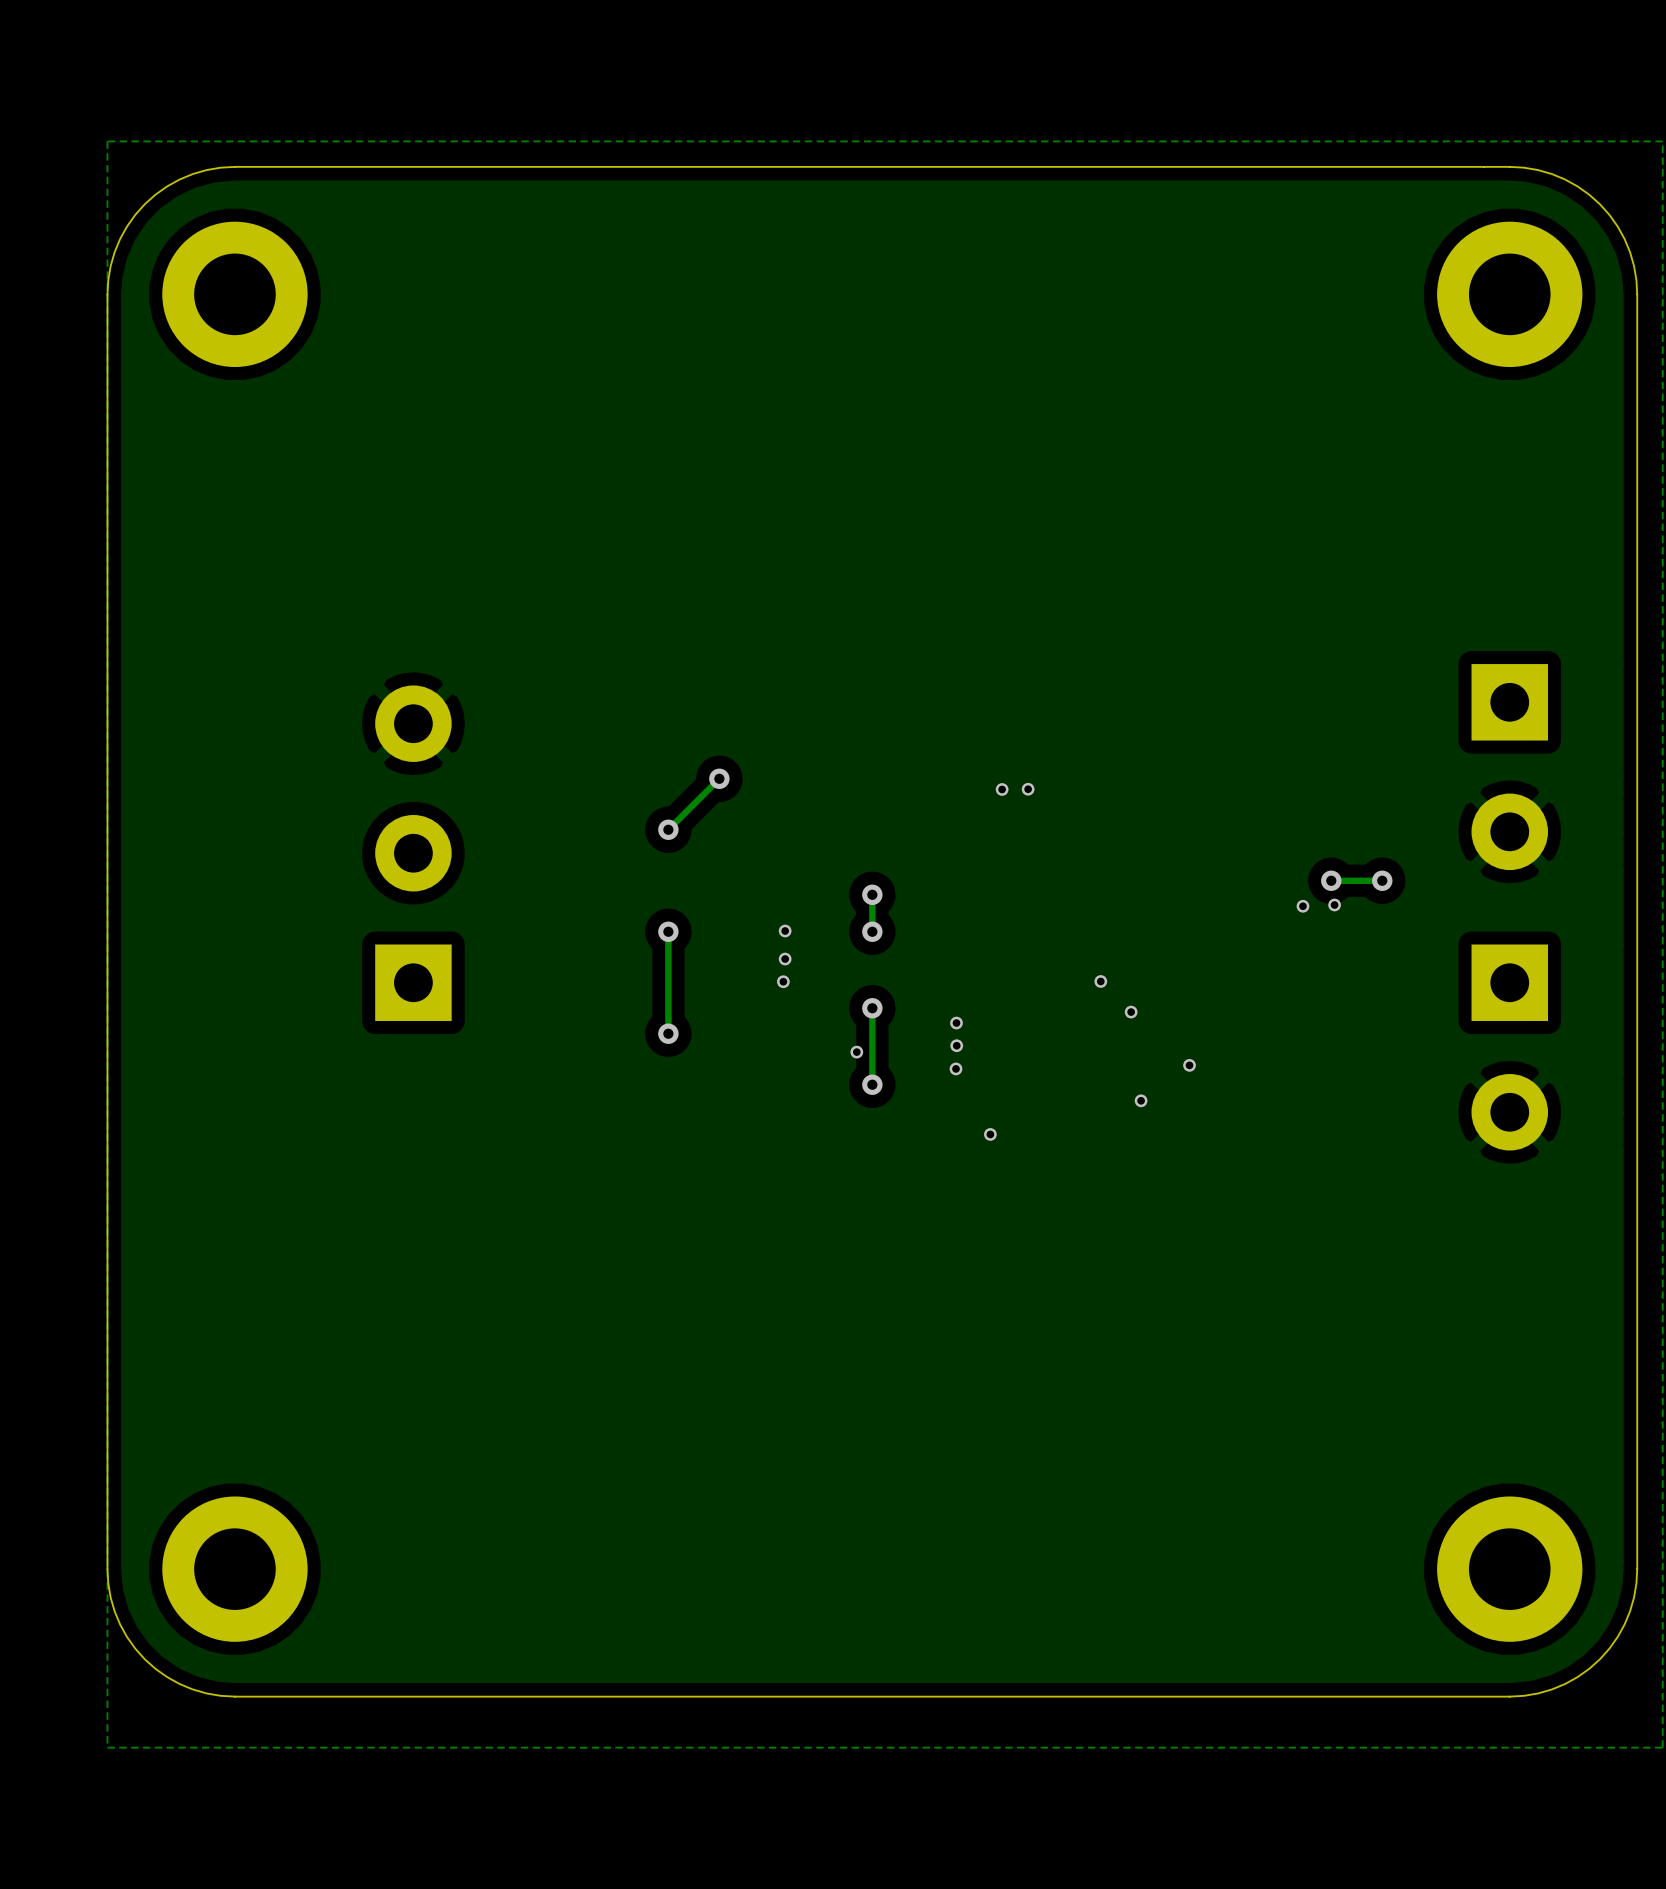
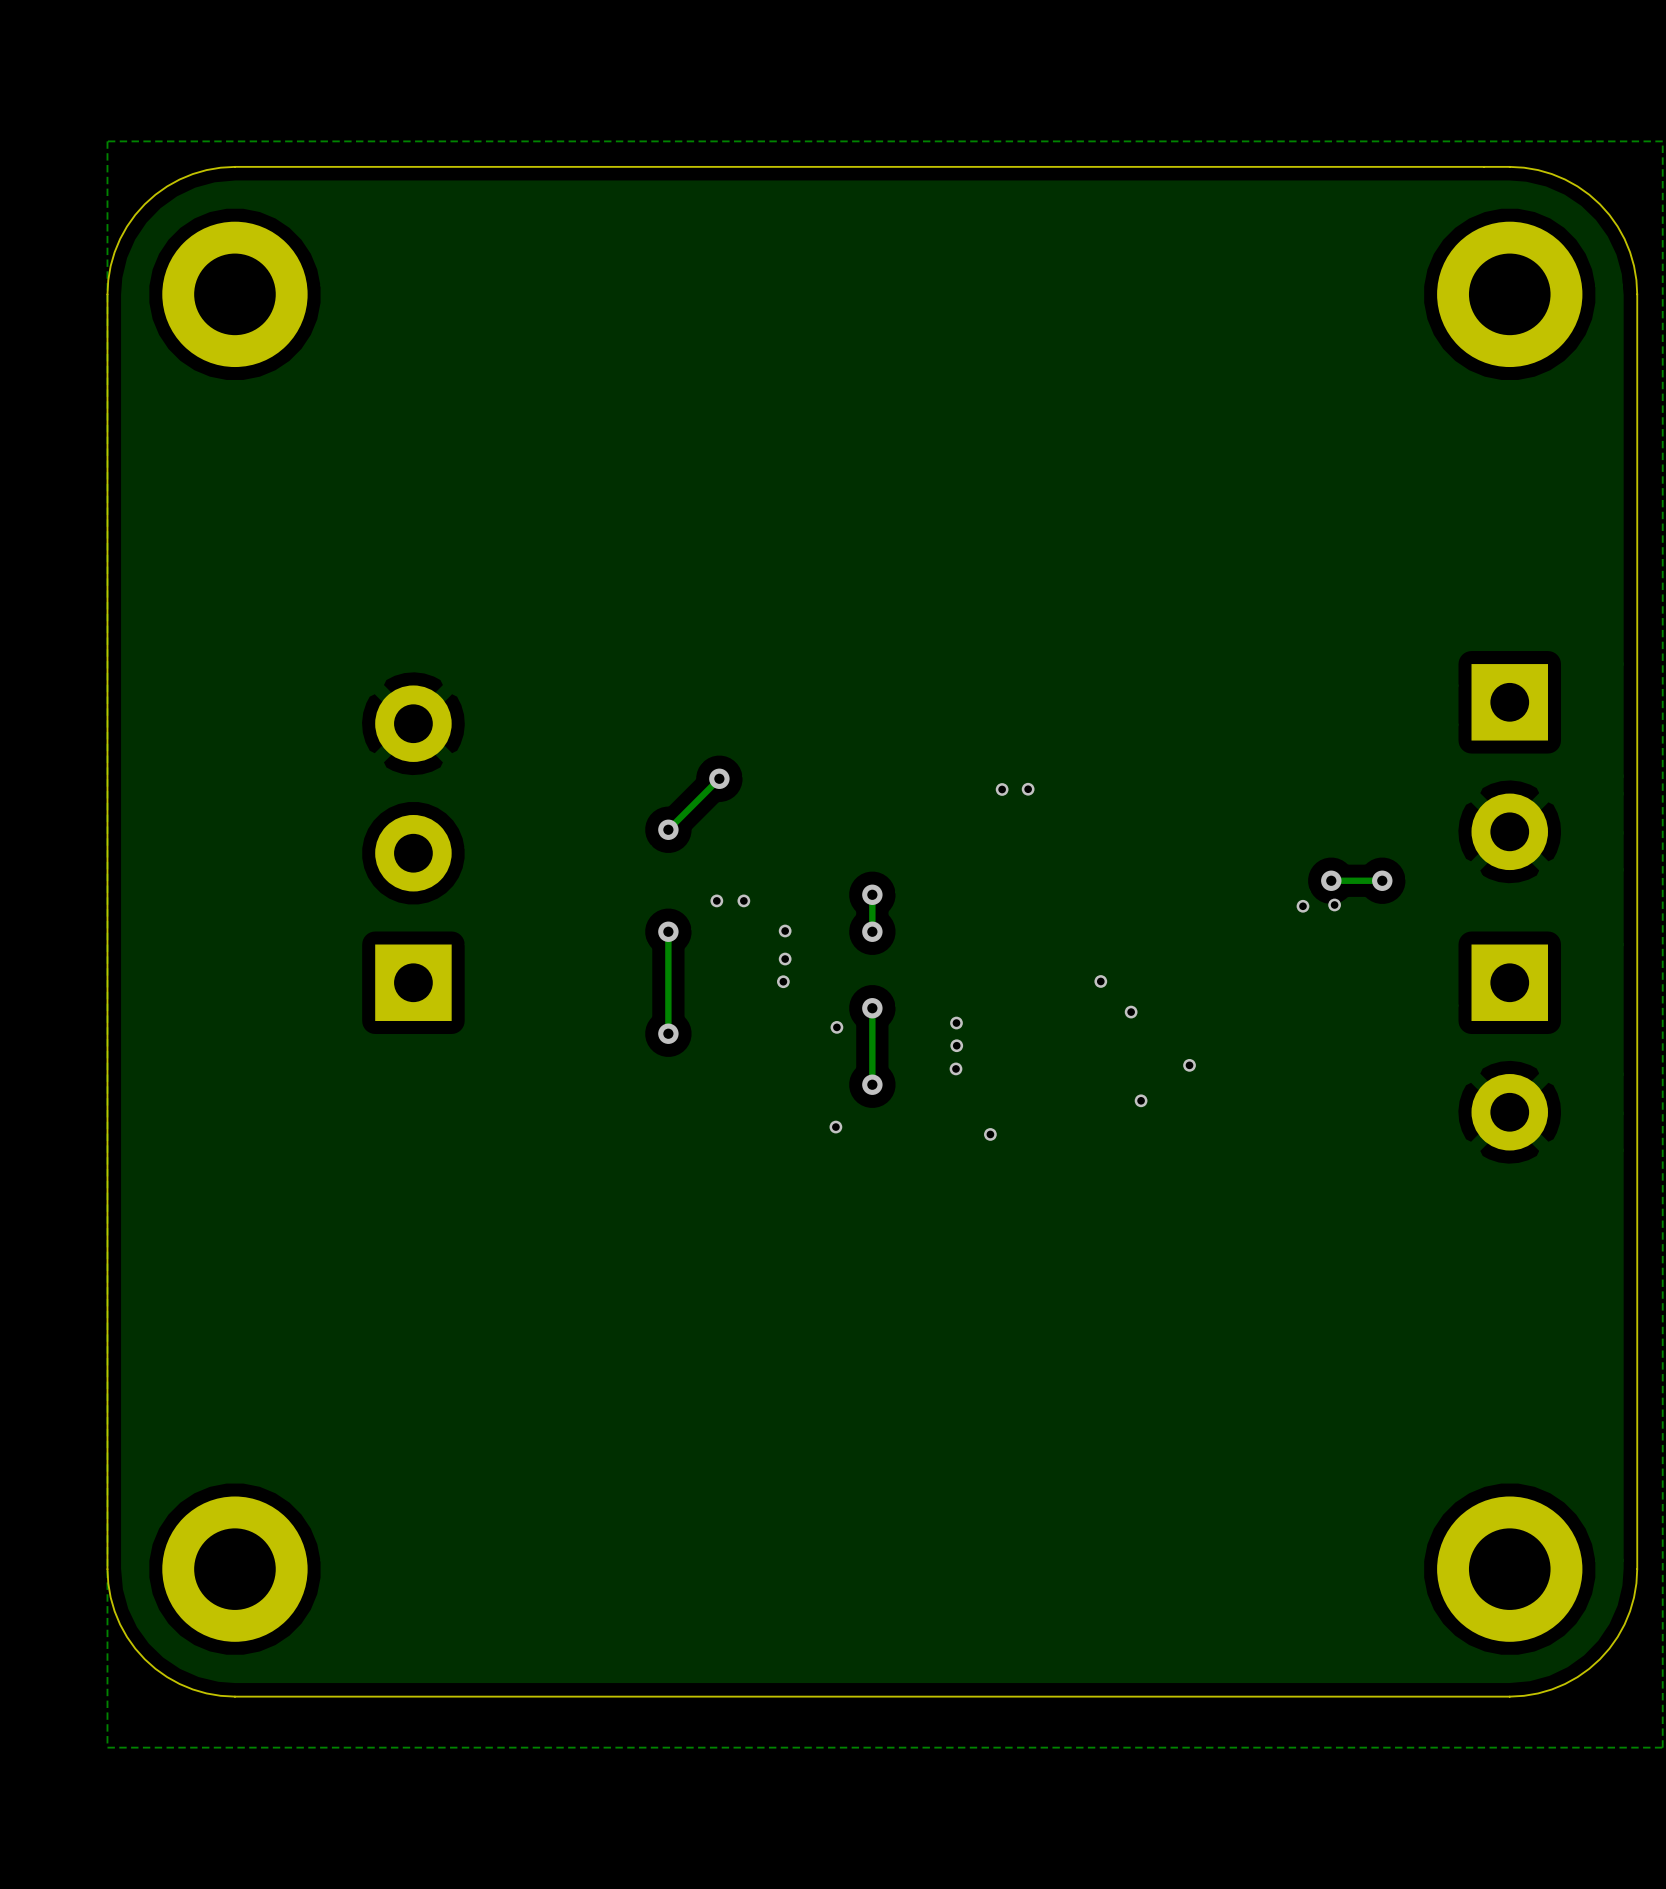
via: none -> (716, 900)
via: none -> (743, 900)
via position: (856, 1052) -> (836, 1027)
via: none -> (835, 1127)

